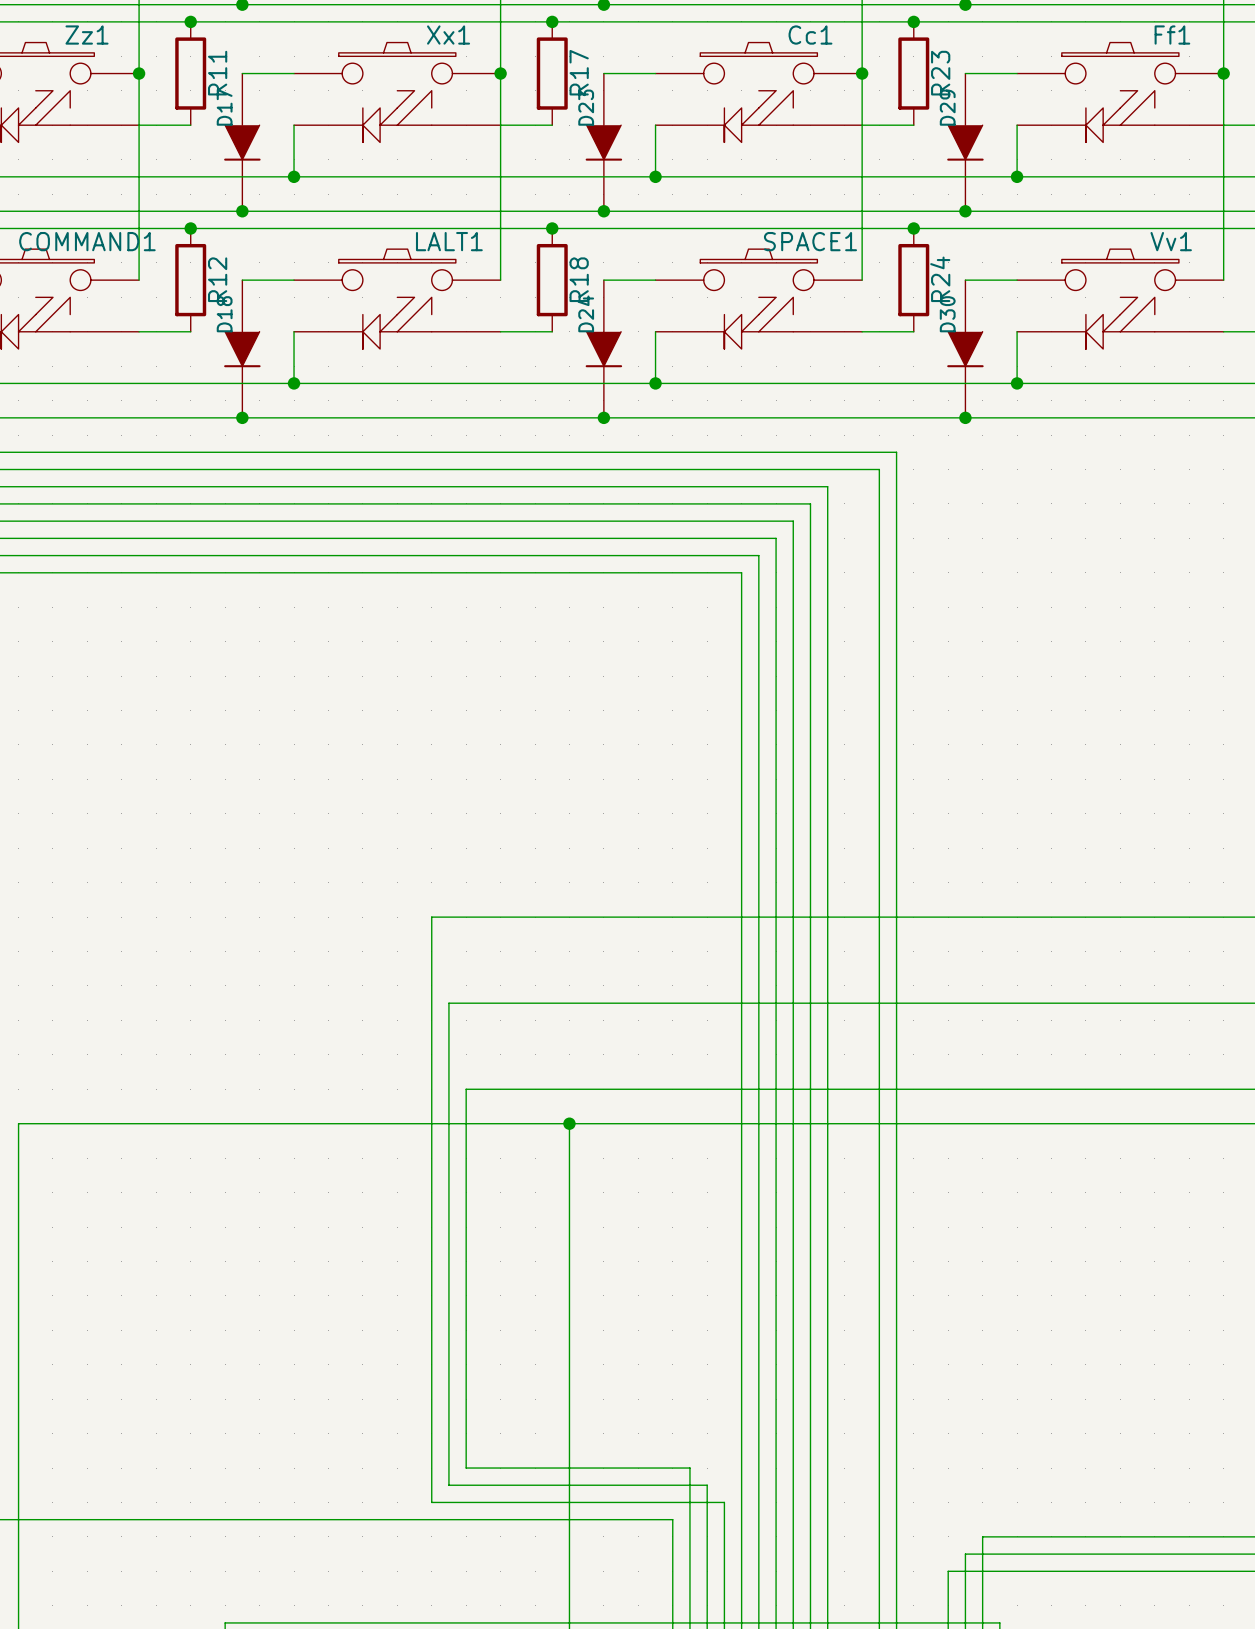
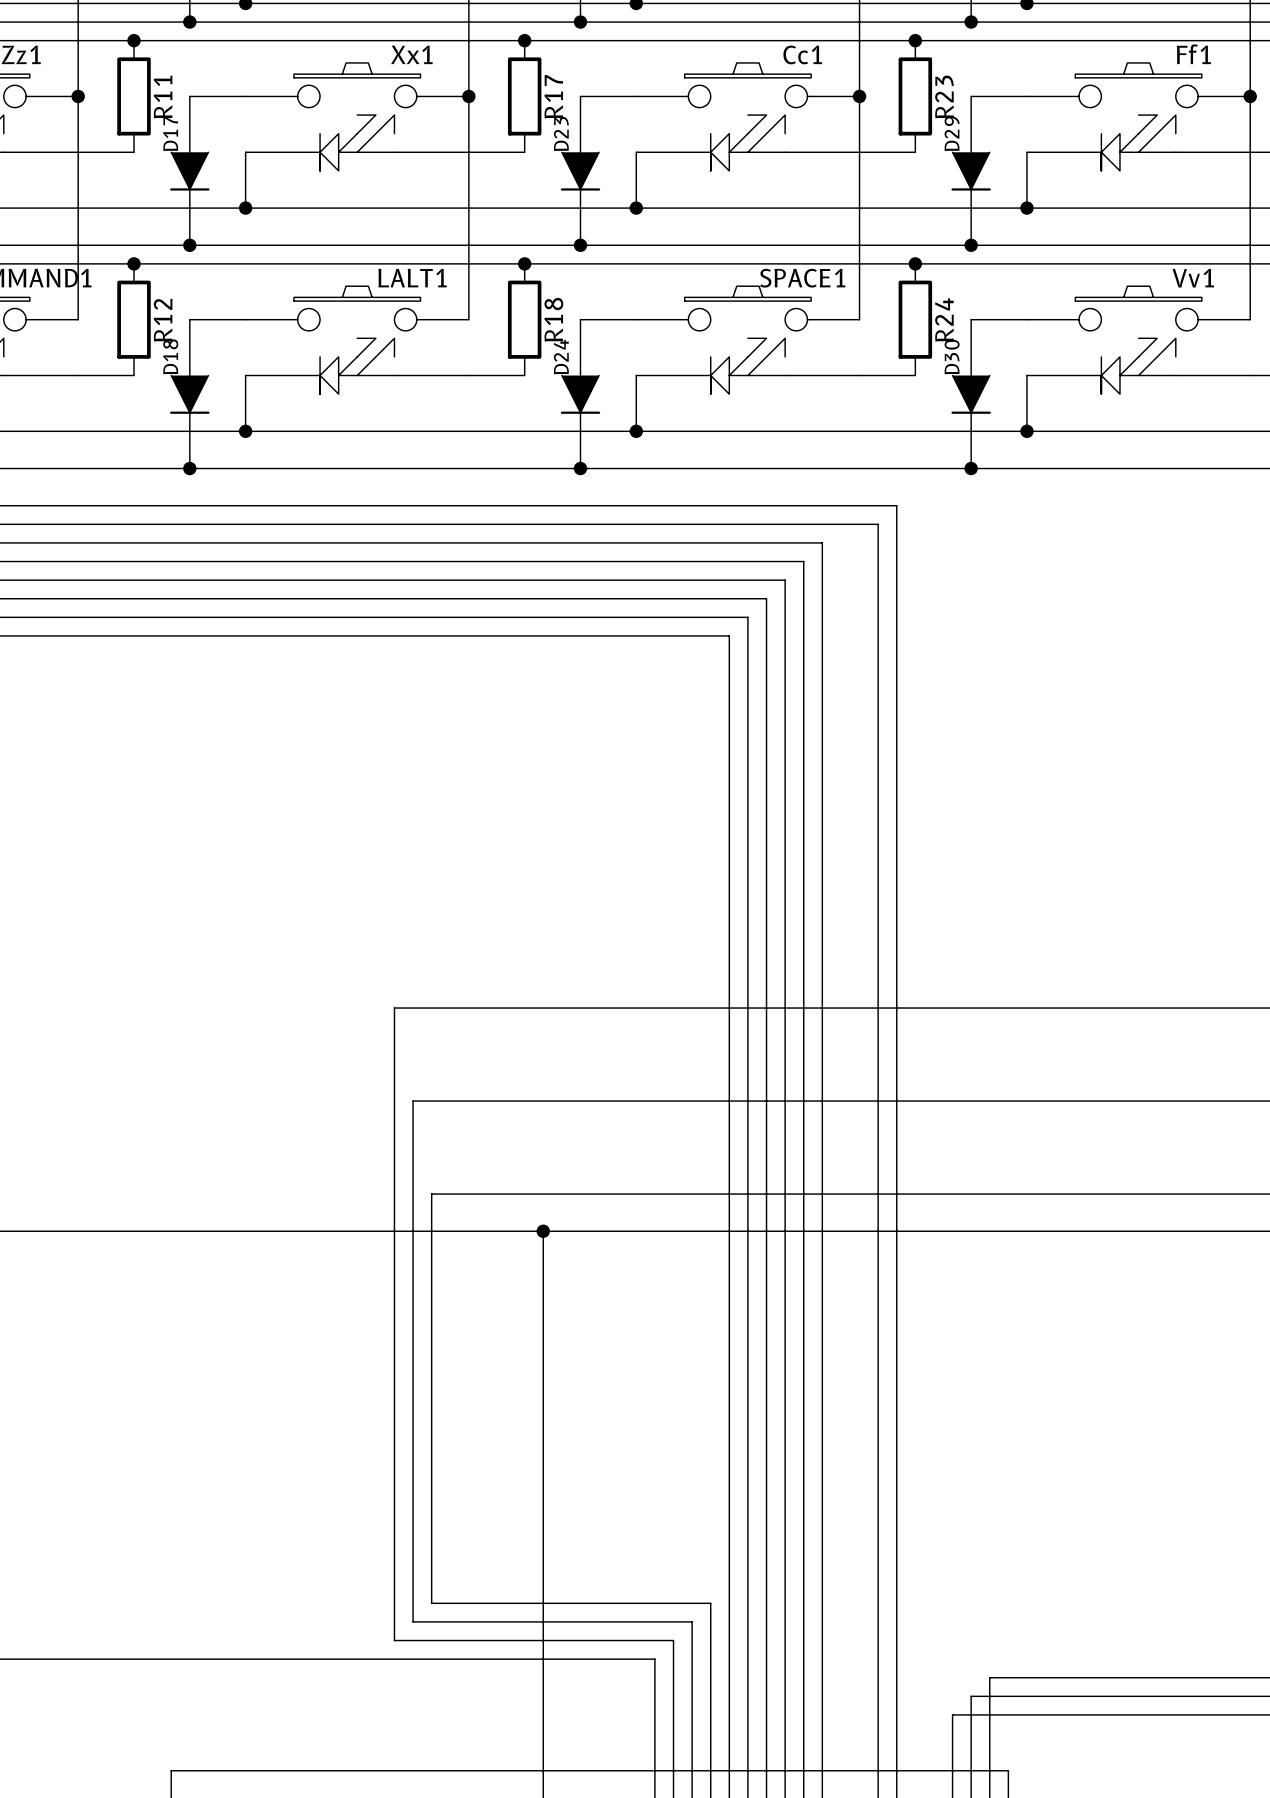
wire: (689, 1468) (689, 1502) (724, 1502) -> (673, 1603) (710, 1603) (710, 1640)

